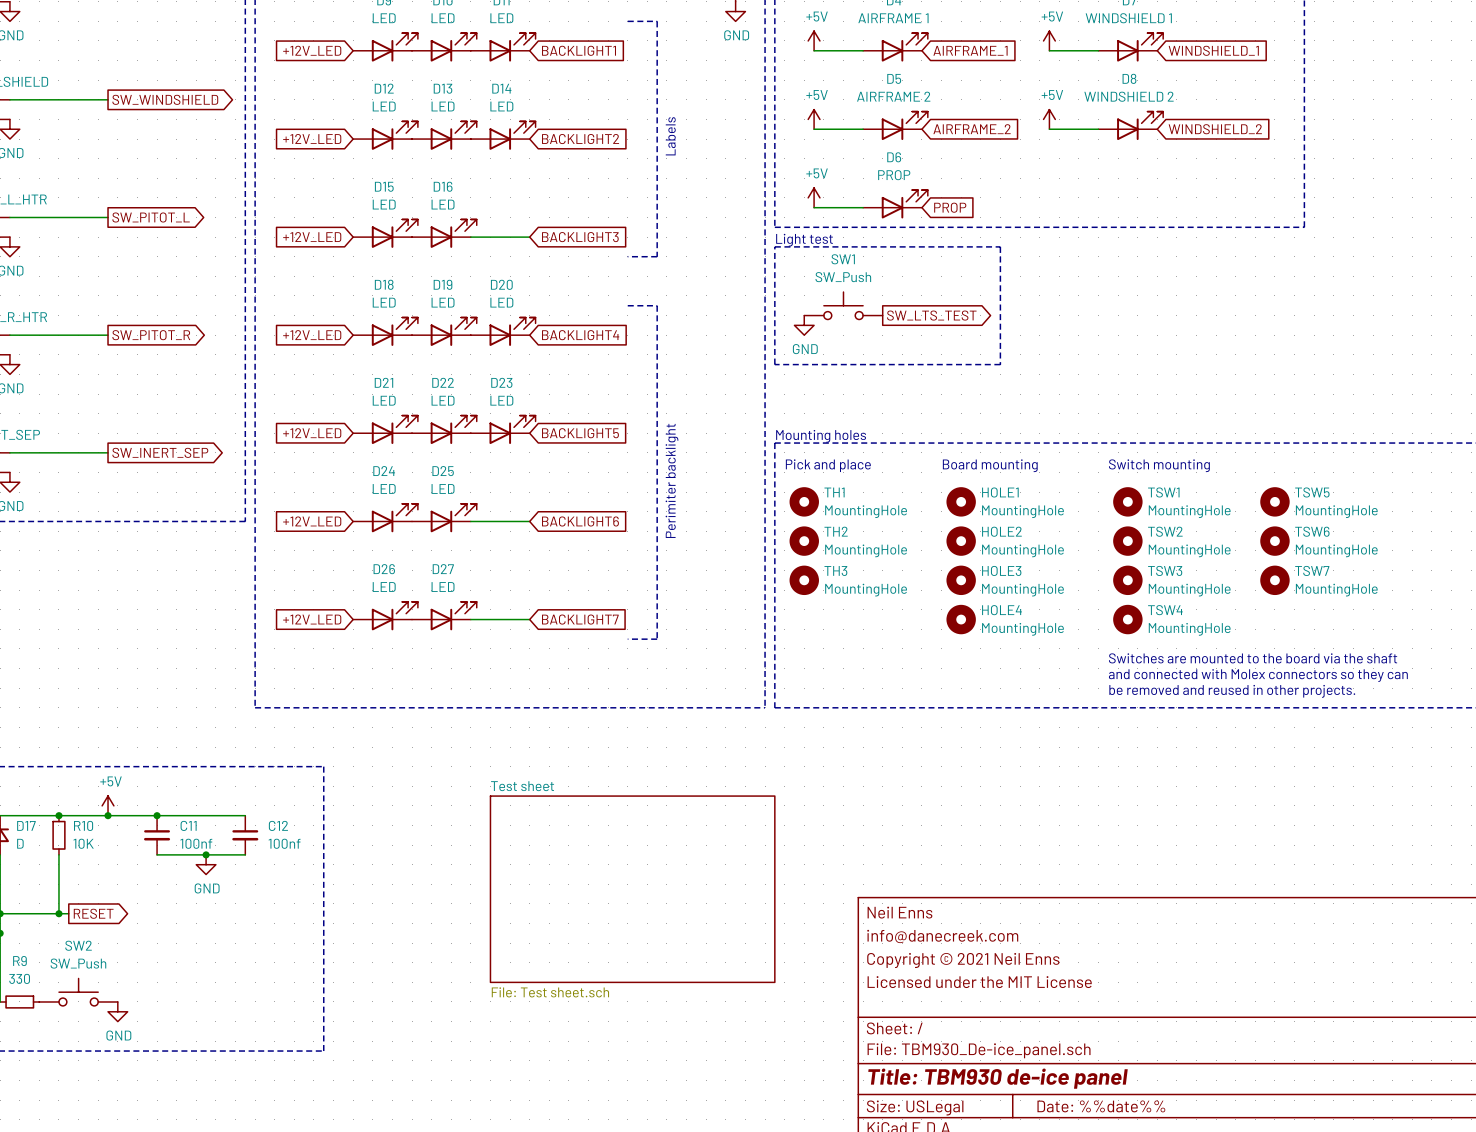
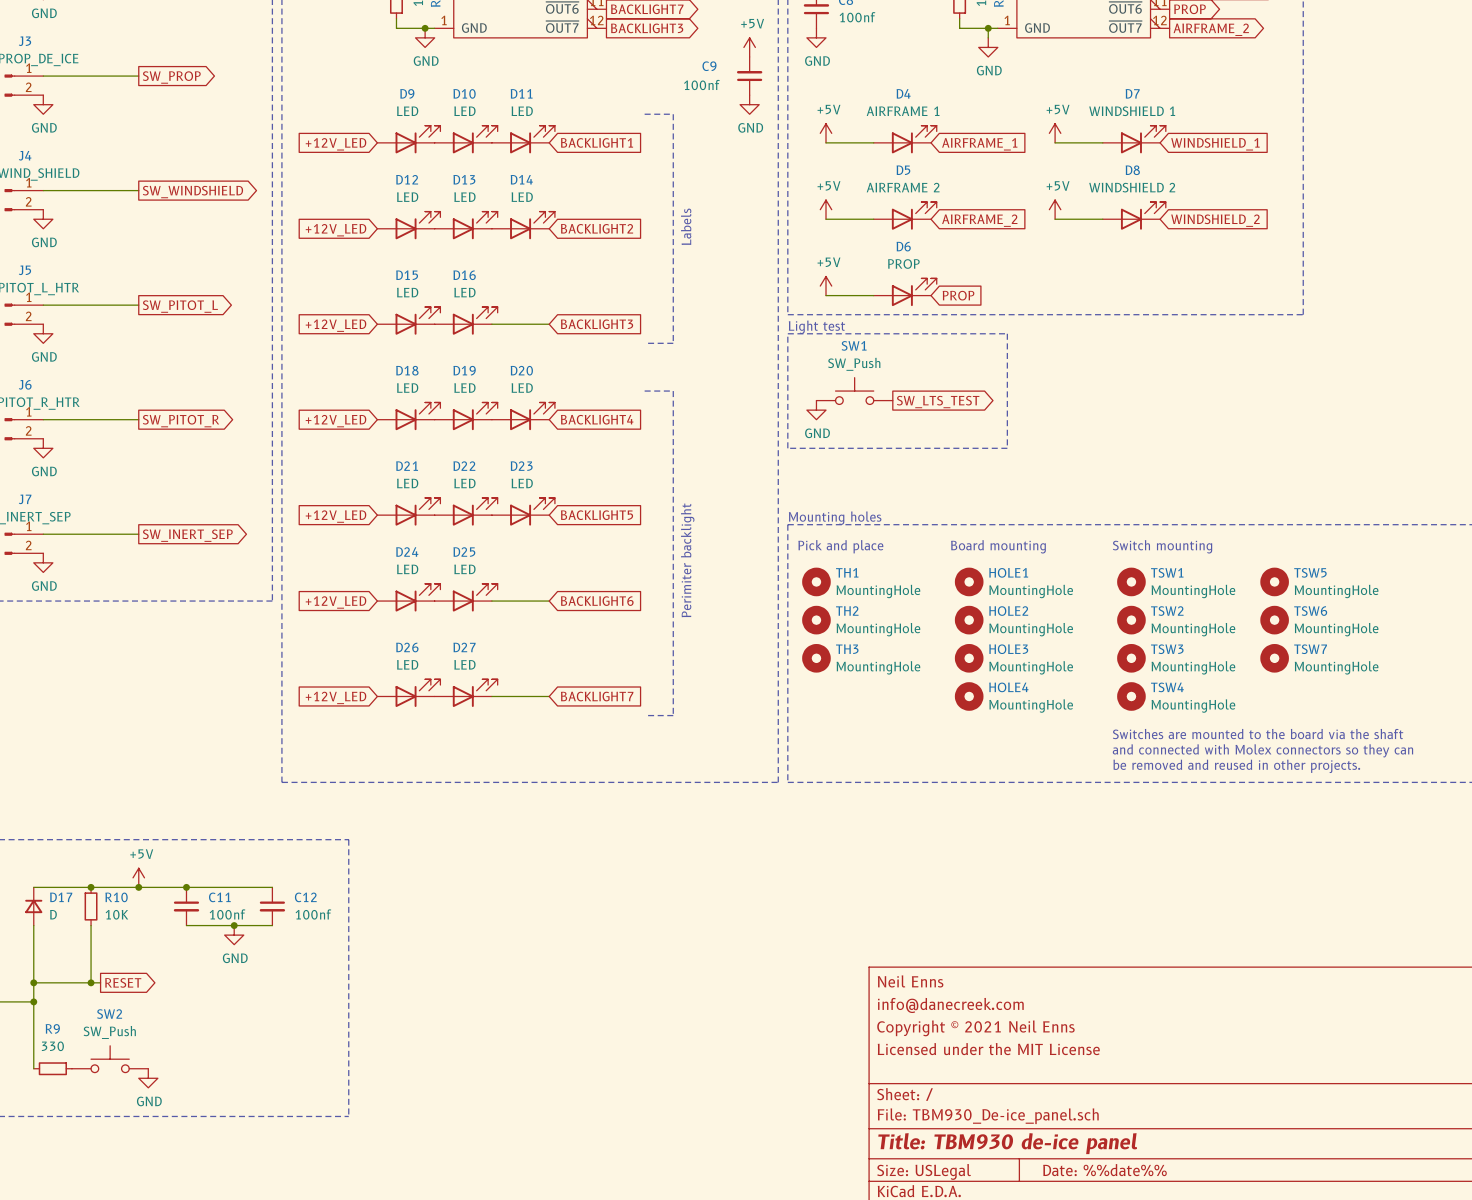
sheet Test sheet: File: Test sheet.sch (632, 889) -> none

